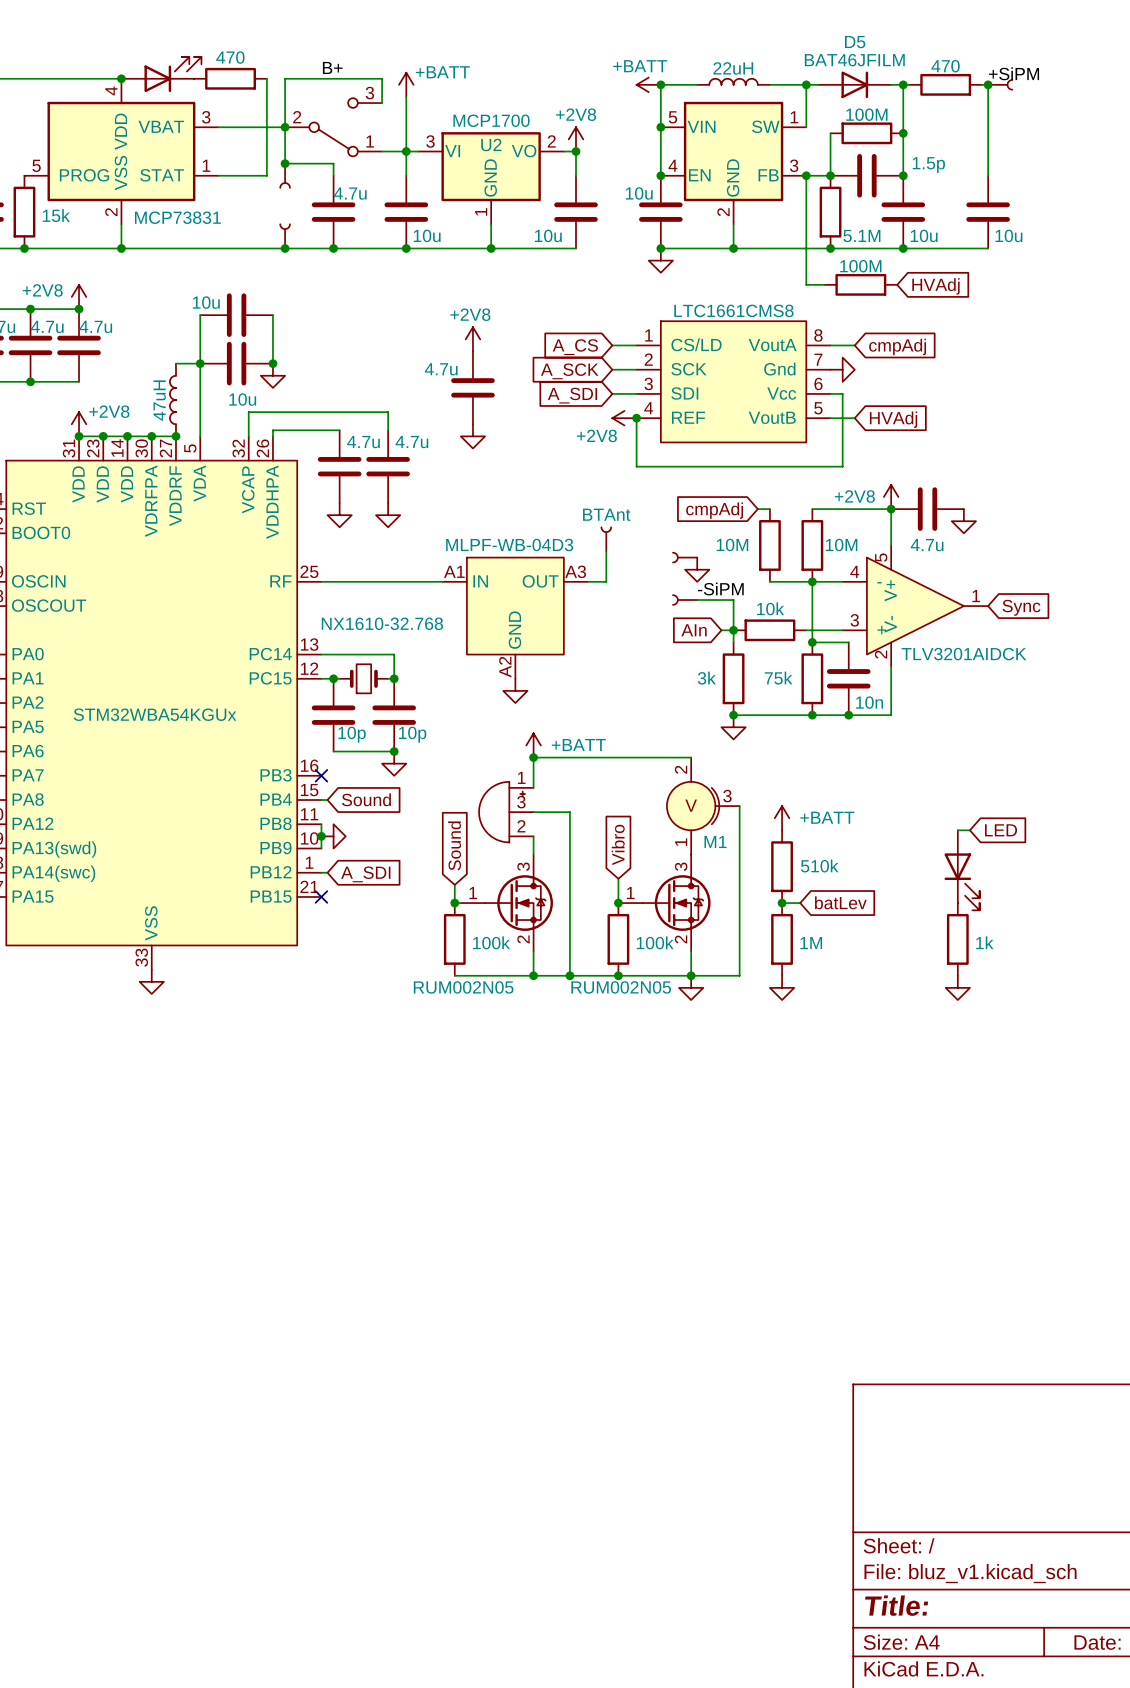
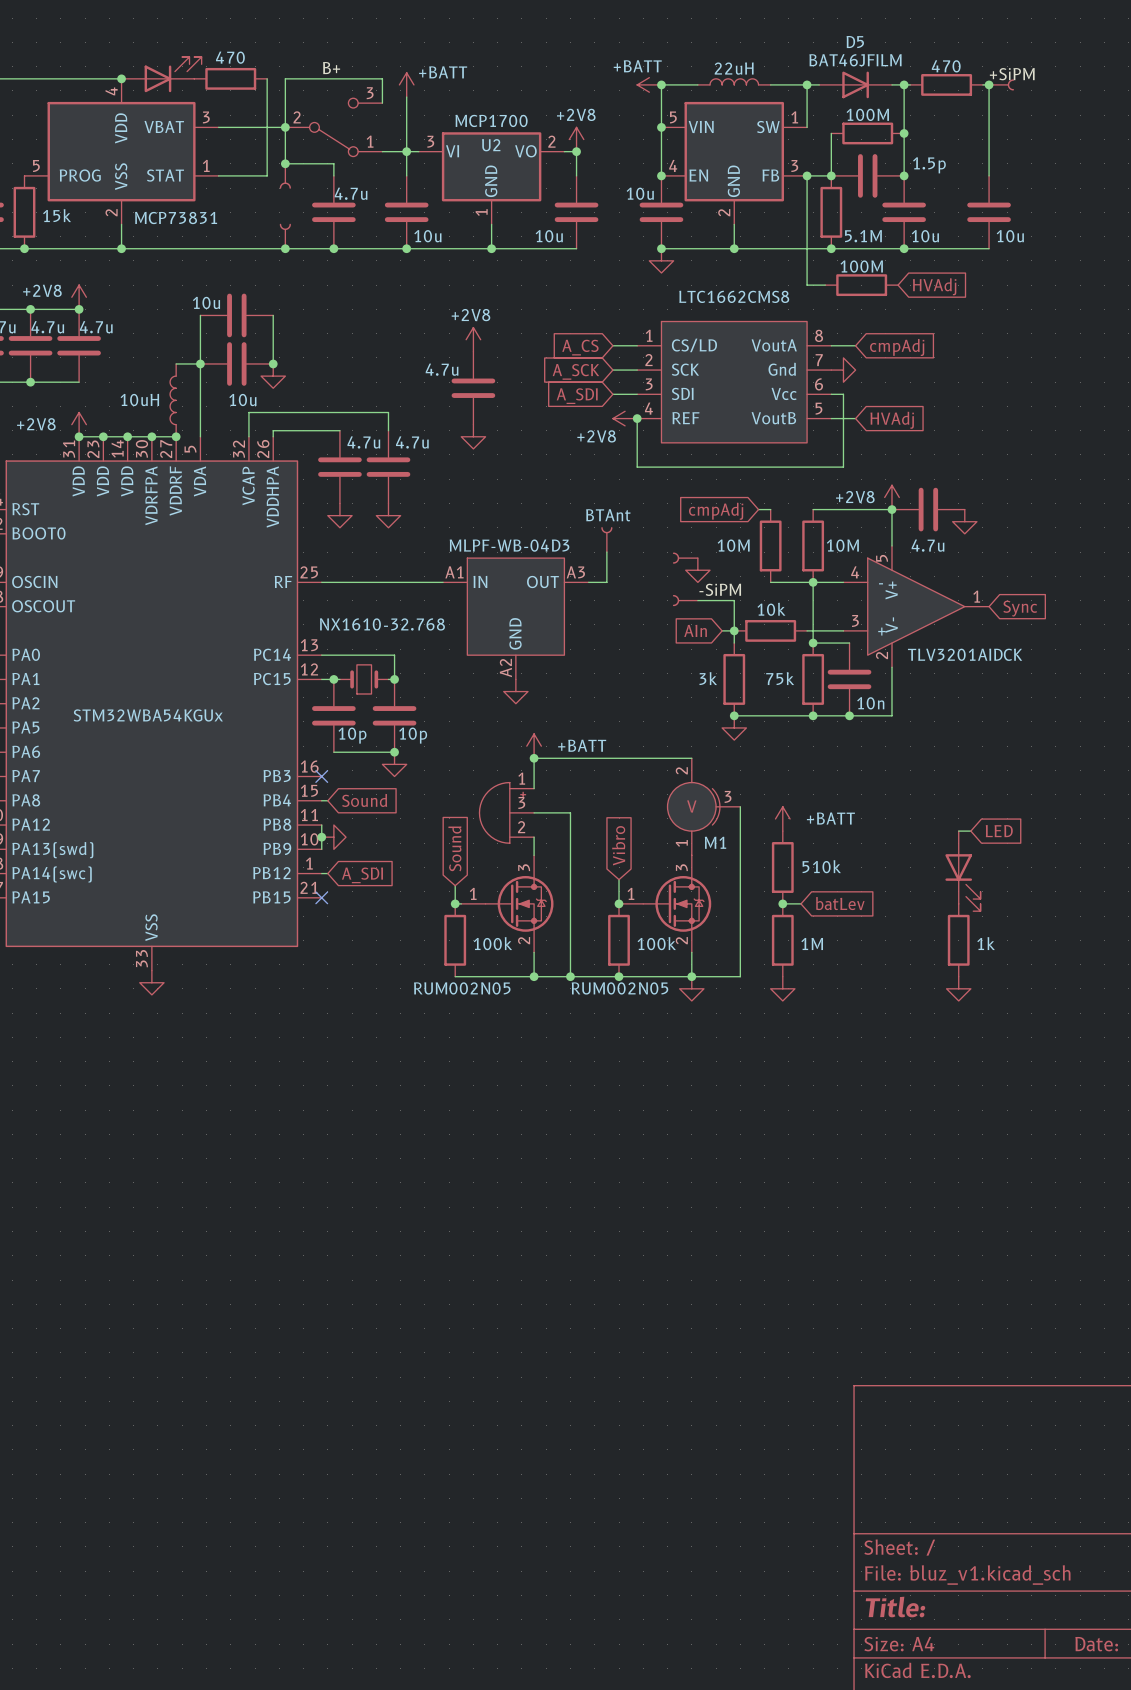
part value: LTC1661CMS8 (733, 310) -> LTC1662CMS8 (734, 296)
part value: 47uH (159, 400) -> 10uH (139, 399)
power symbol text position: +2V8 (109, 411) -> +2V8 (36, 424)

